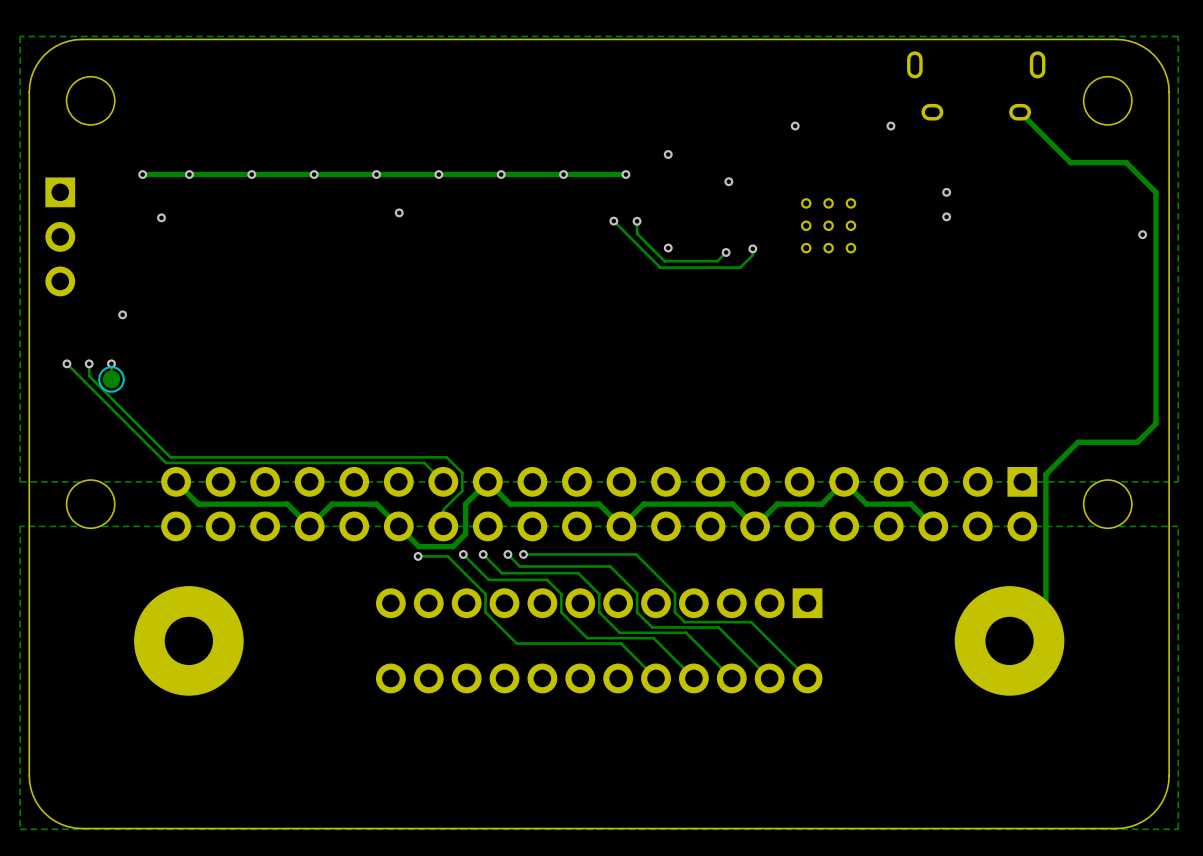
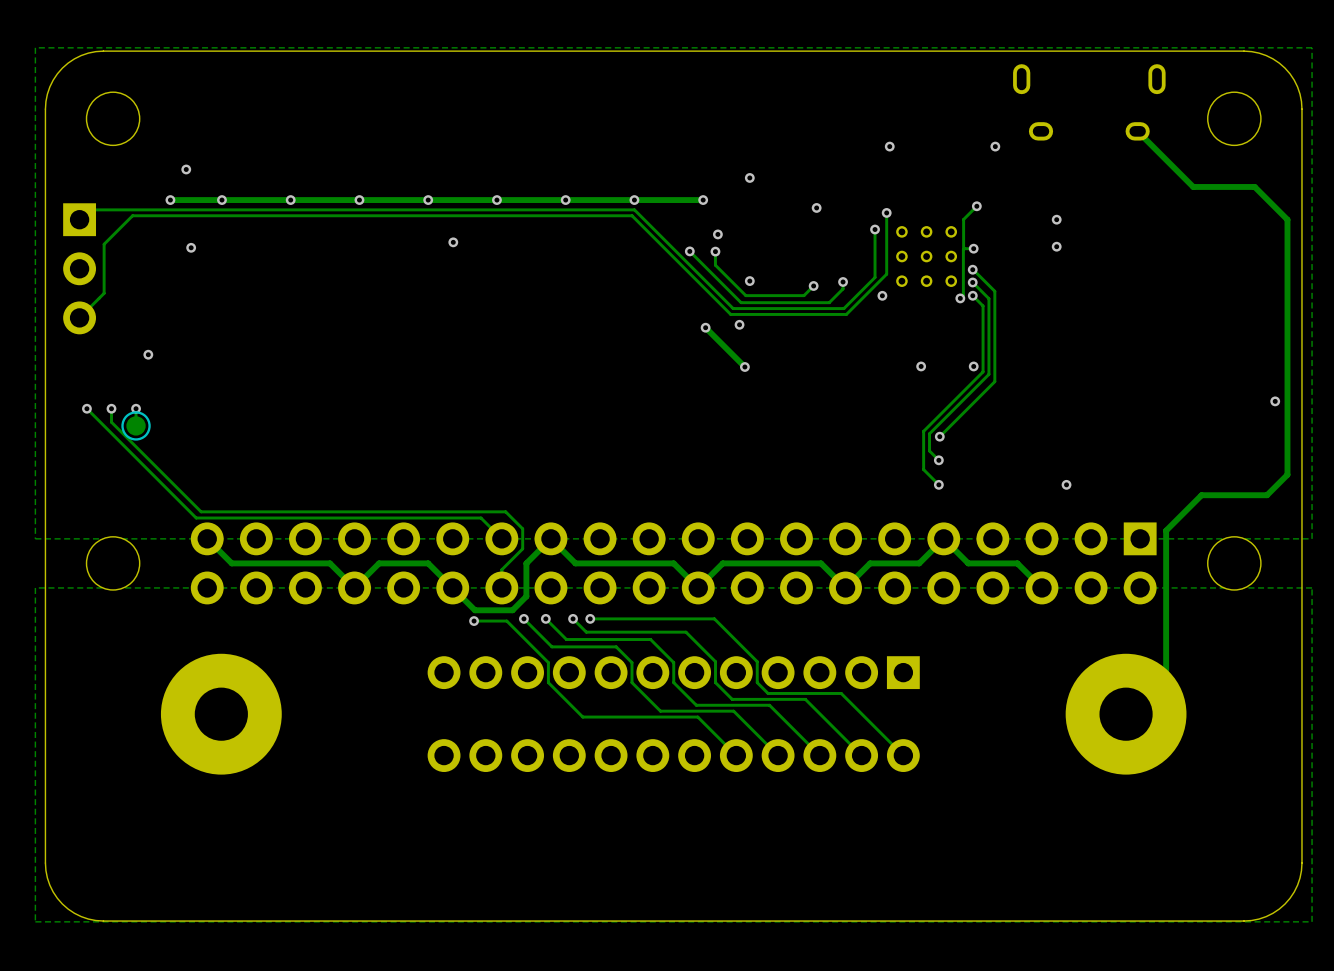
via: none -> (186, 169)
track: none -> (976, 206) (963, 219) (963, 249)
via: none -> (976, 206)
track: none -> (886, 212) (886, 274) (846, 314) (730, 314) (632, 215) (132, 215) (104, 244) (104, 293) (79, 317)
via: none -> (886, 212)
track: none -> (79, 219) (89, 209) (634, 209) (733, 308) (843, 308) (875, 277) (875, 229)
via: none -> (875, 229)
via: none -> (717, 234)
via: none -> (973, 248)
track: none -> (973, 249) (963, 249) (963, 295) (960, 298)
via: (1142, 234) -> none
track: none -> (972, 269) (994, 291) (994, 381) (939, 436)
via: none -> (972, 269)
track: none -> (972, 282) (988, 298) (988, 374) (929, 433) (929, 450) (938, 460)
via: none -> (972, 282)
via: none -> (882, 295)
track: none -> (972, 295) (983, 306) (983, 371) (923, 431) (923, 469) (938, 484)
via: none -> (972, 295)
via: none -> (960, 298)
via: none -> (739, 324)
track: none -> (705, 327) (744, 367)
via: none -> (705, 327)
via: none -> (744, 367)
via: none -> (921, 366)
via: none -> (973, 366)
via: none -> (1275, 401)
via: none -> (939, 436)
via: none -> (938, 460)
via: none -> (938, 484)
via: none -> (1066, 484)

